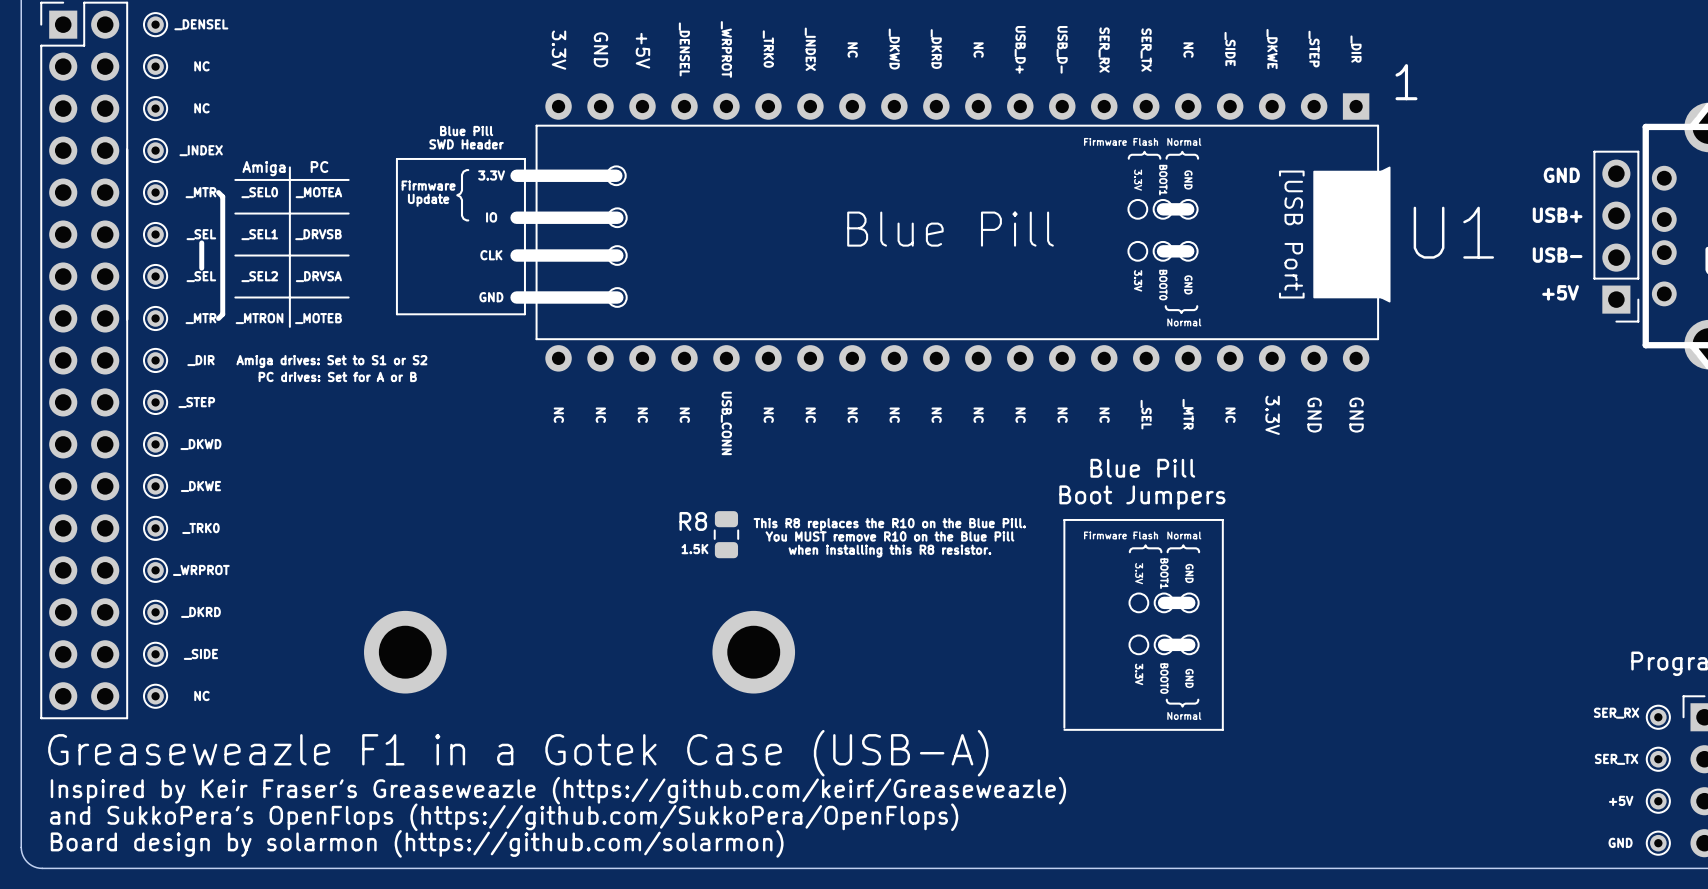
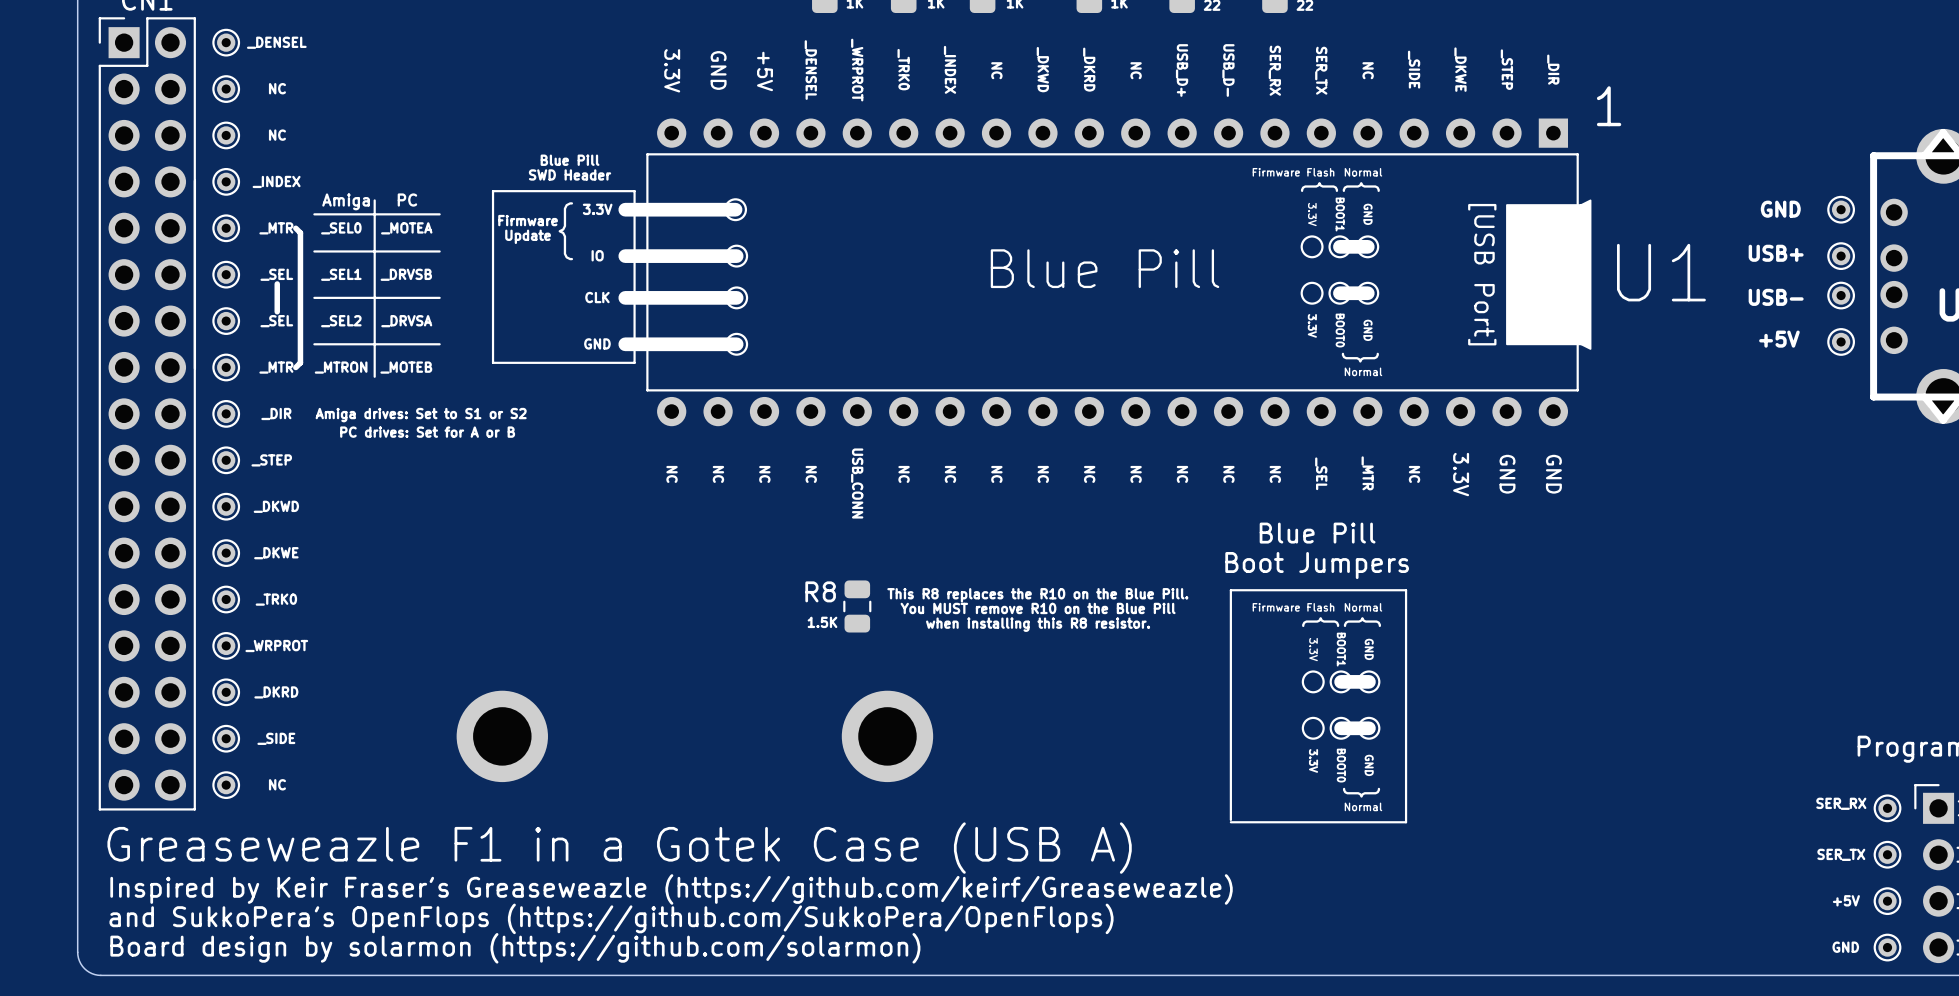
part: none -> (1841, 209)
part: none -> (1841, 256)
part: (1616, 236) -> none
part: none -> (1841, 295)
part: none -> (1841, 341)
text: Greaseweazle F1 in a Gotek Case (USB-A) (518, 753) -> Greaseweazle F1 in a Gotek Case (USB A) (619, 848)

